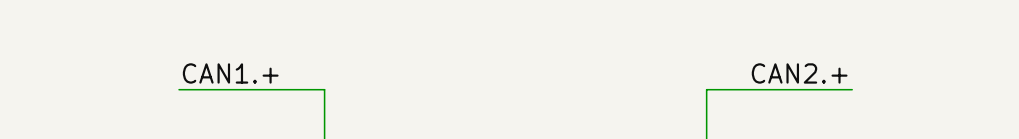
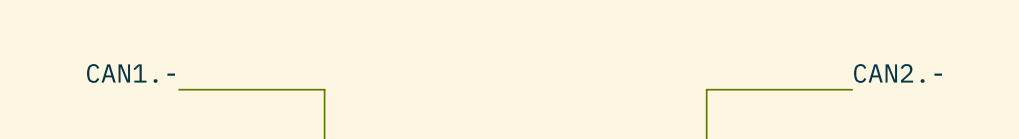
label: CAN1.+ (230, 73) -> CAN1.- (131, 73)
label: CAN2.+ (799, 73) -> CAN2.- (898, 73)

